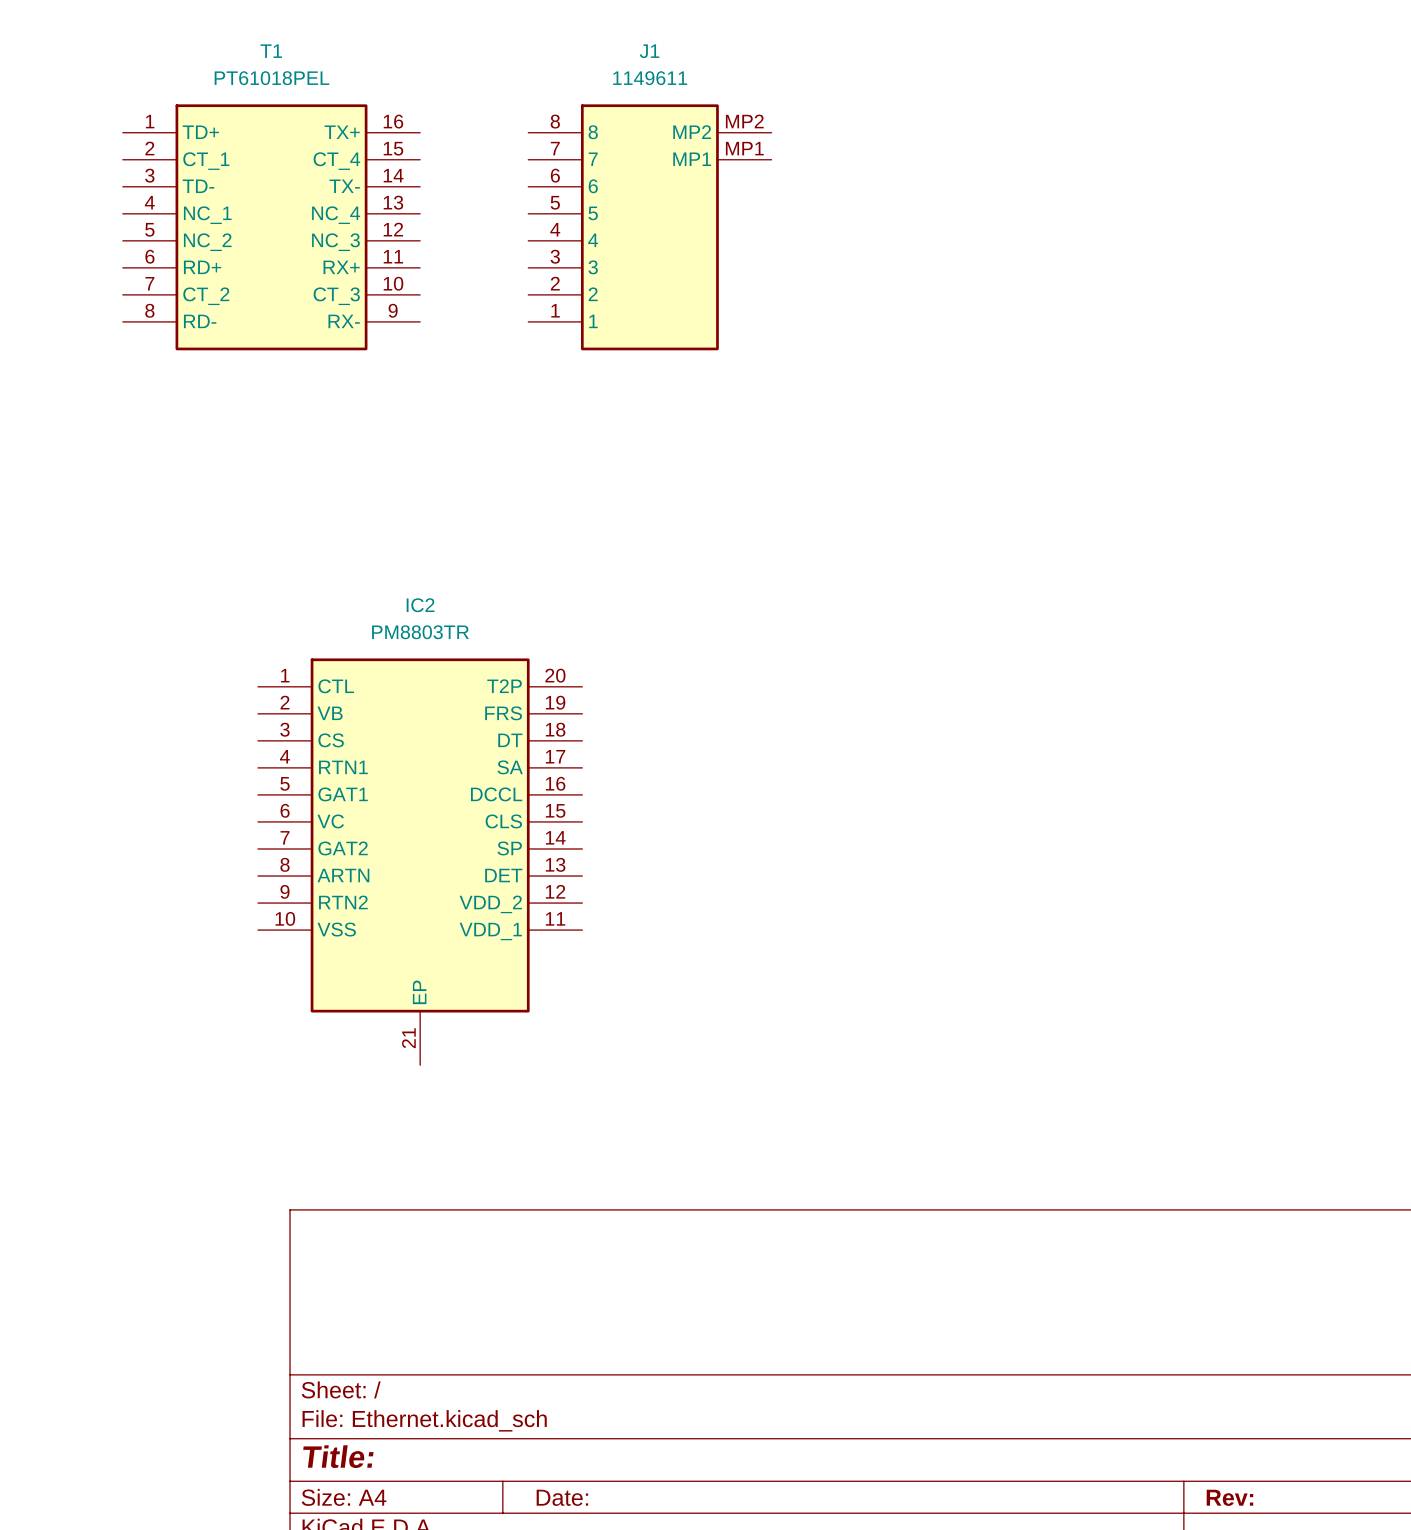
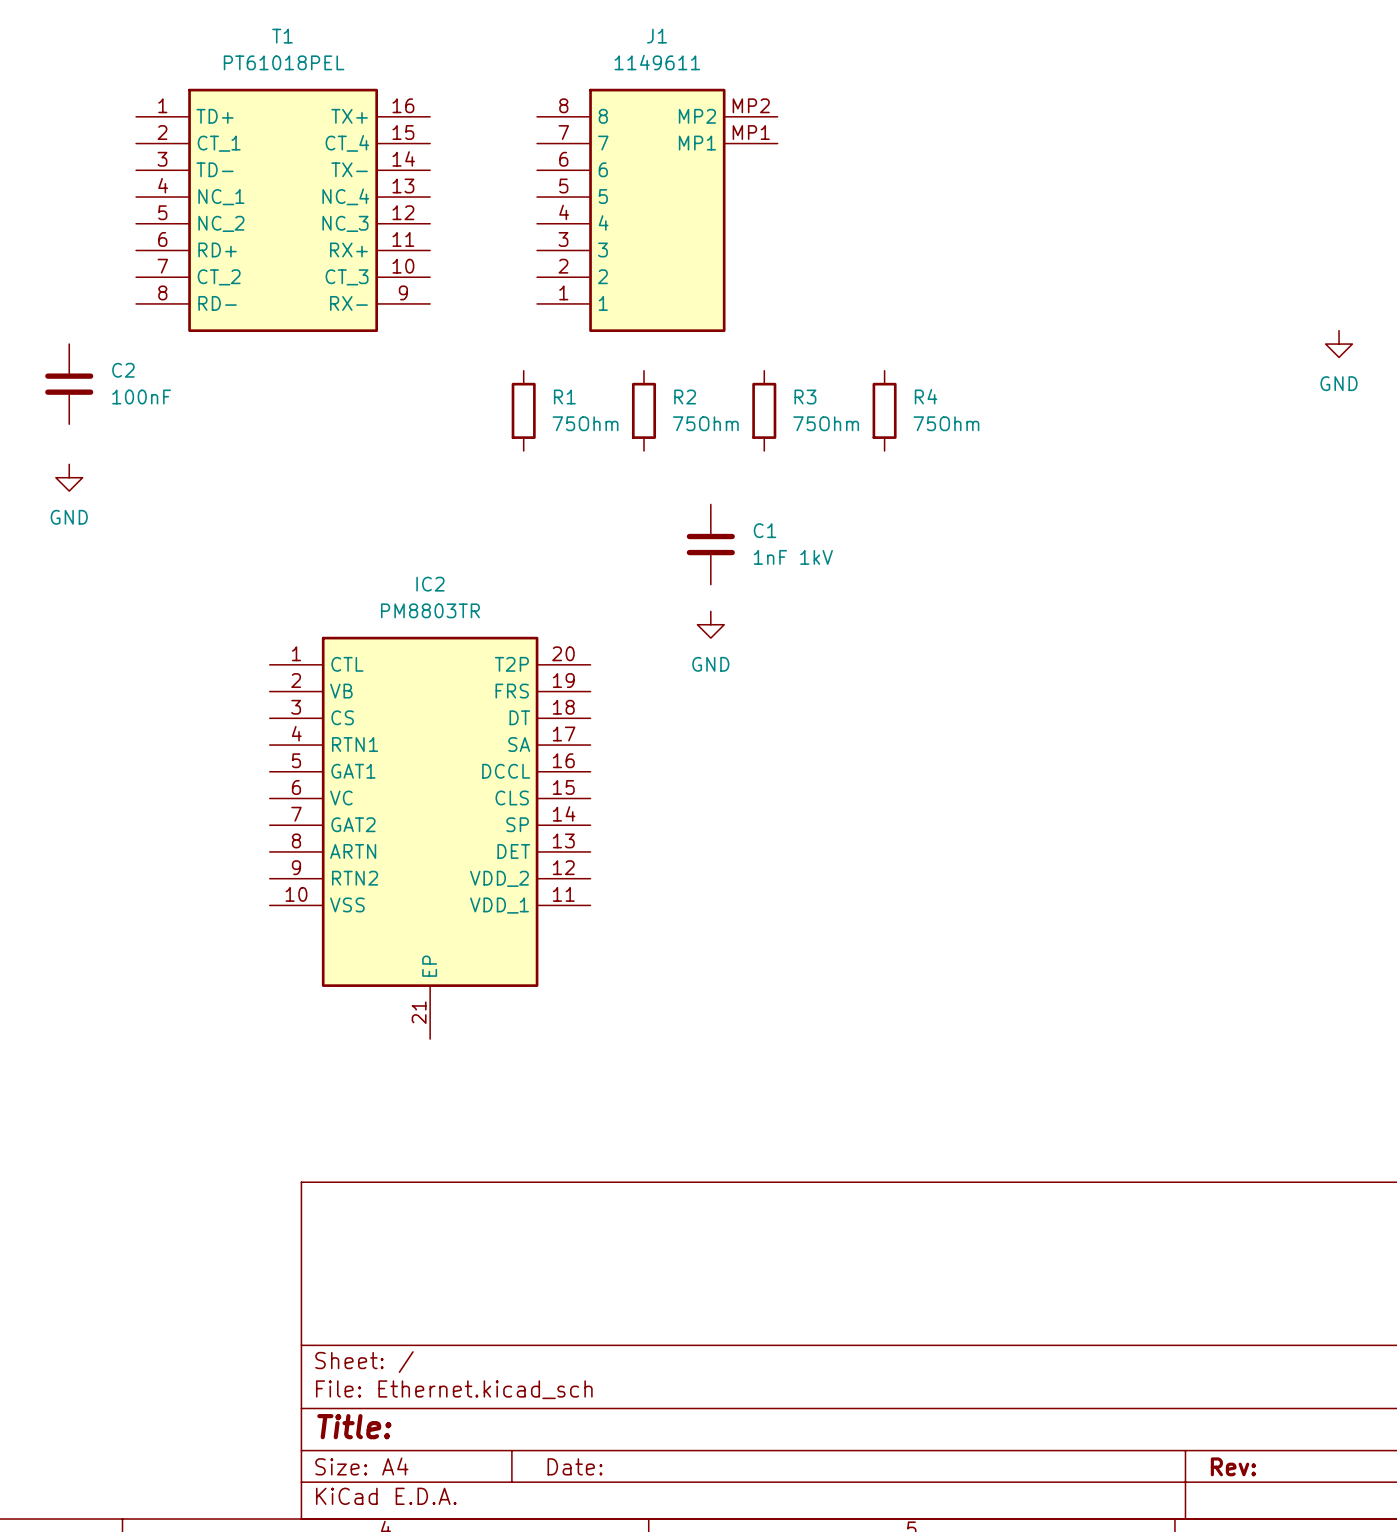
power symbol: none -> GND (1339, 344)
C2: none -> 100nF (69, 384)
R1: none -> 75Ohm (523, 410)
R2: none -> 75Ohm (643, 410)
R3: none -> 75Ohm (764, 410)
R4: none -> 75Ohm (884, 410)
power symbol: none -> GND (69, 477)
C1: none -> 1nF 1kV (710, 544)
power symbol: none -> GND (710, 624)

